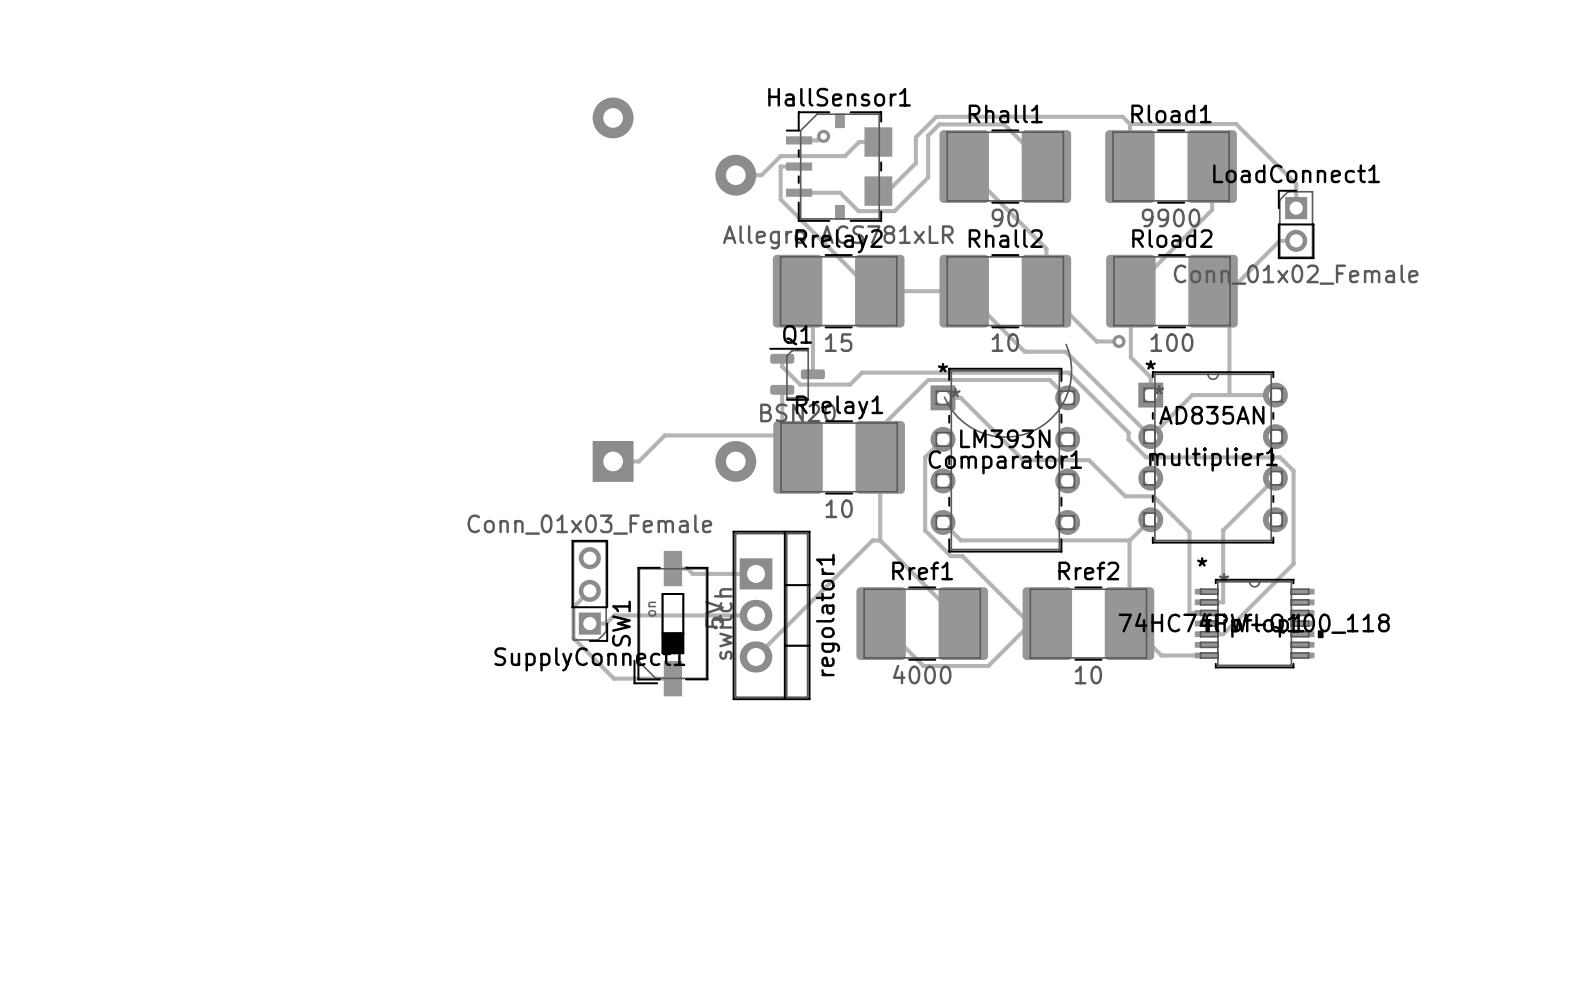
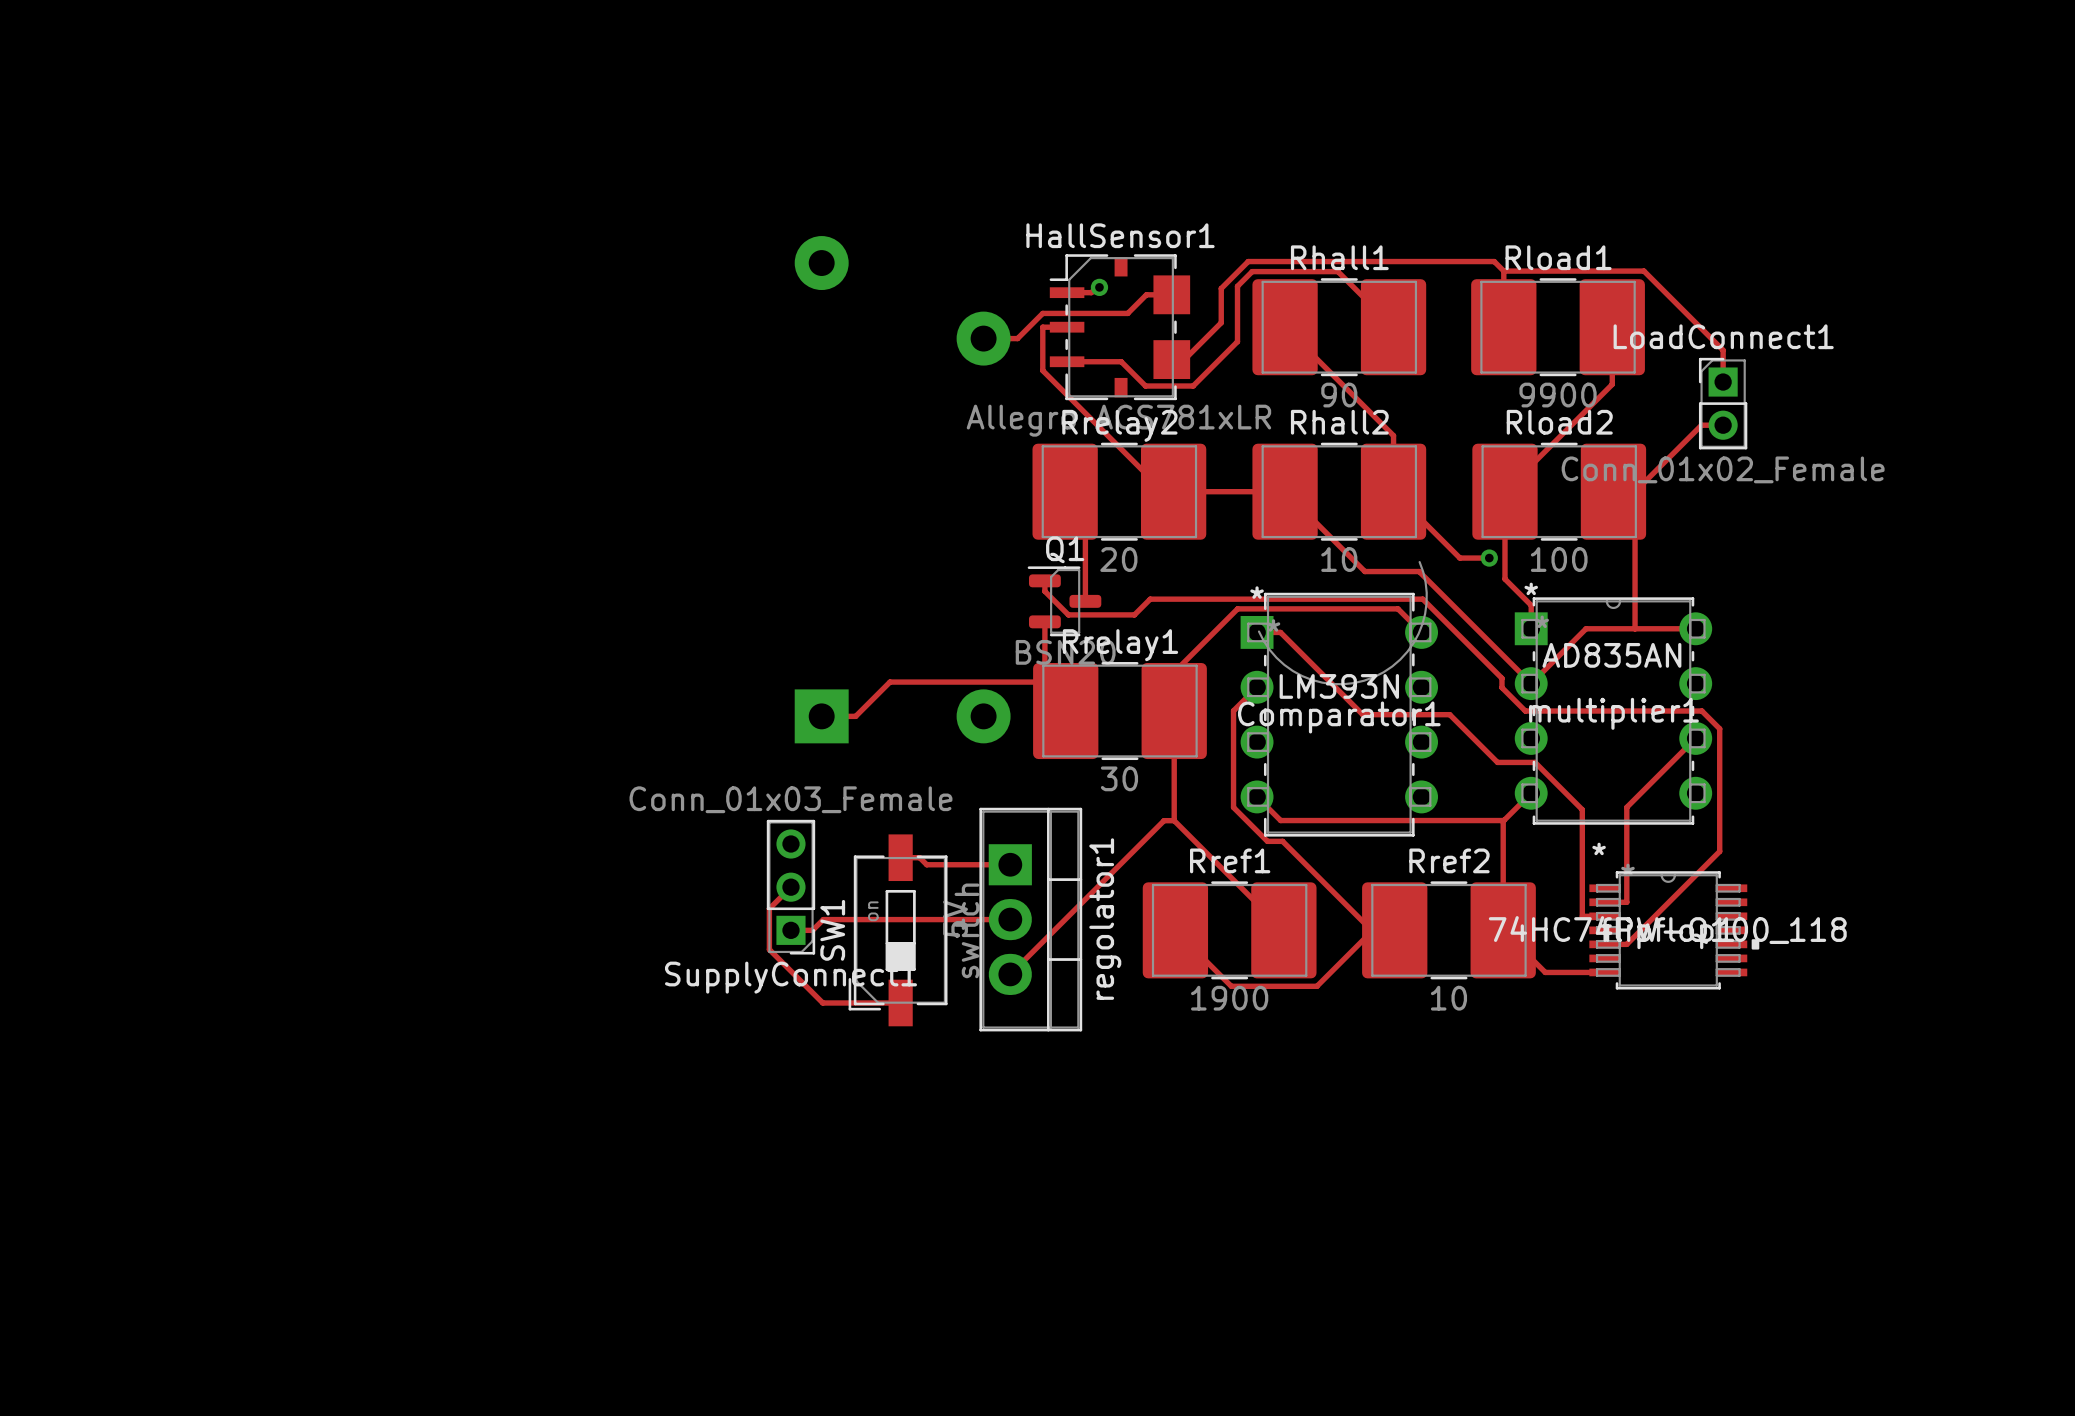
Rrelay2 value: 15 (838, 342) -> 20 (1118, 559)
Rrelay1 value: 10 (839, 508) -> 30 (1119, 778)
Rref1 value: 4000 (922, 674) -> 1900 (1229, 998)

